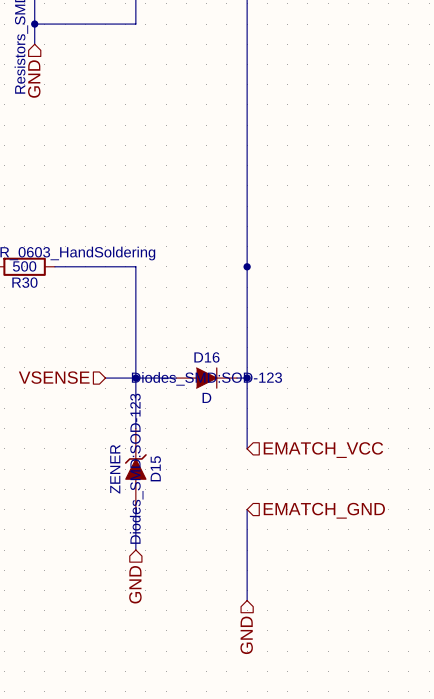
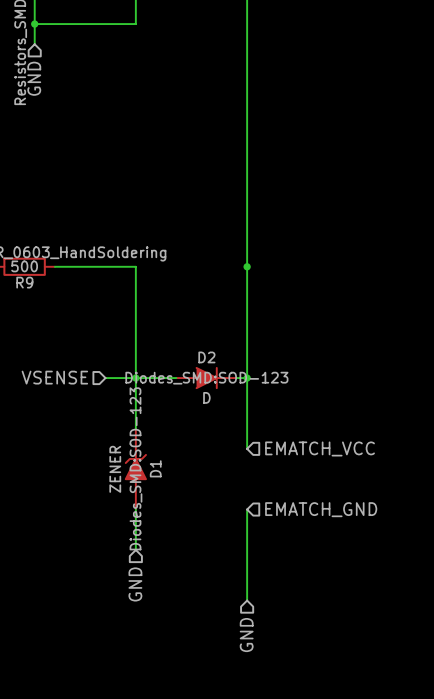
R30 name: R30 (24, 282) -> R9 (24, 282)
D16 name: D16 (206, 357) -> D2 (206, 357)
D15 name: D15 (155, 468) -> D1 (155, 468)

